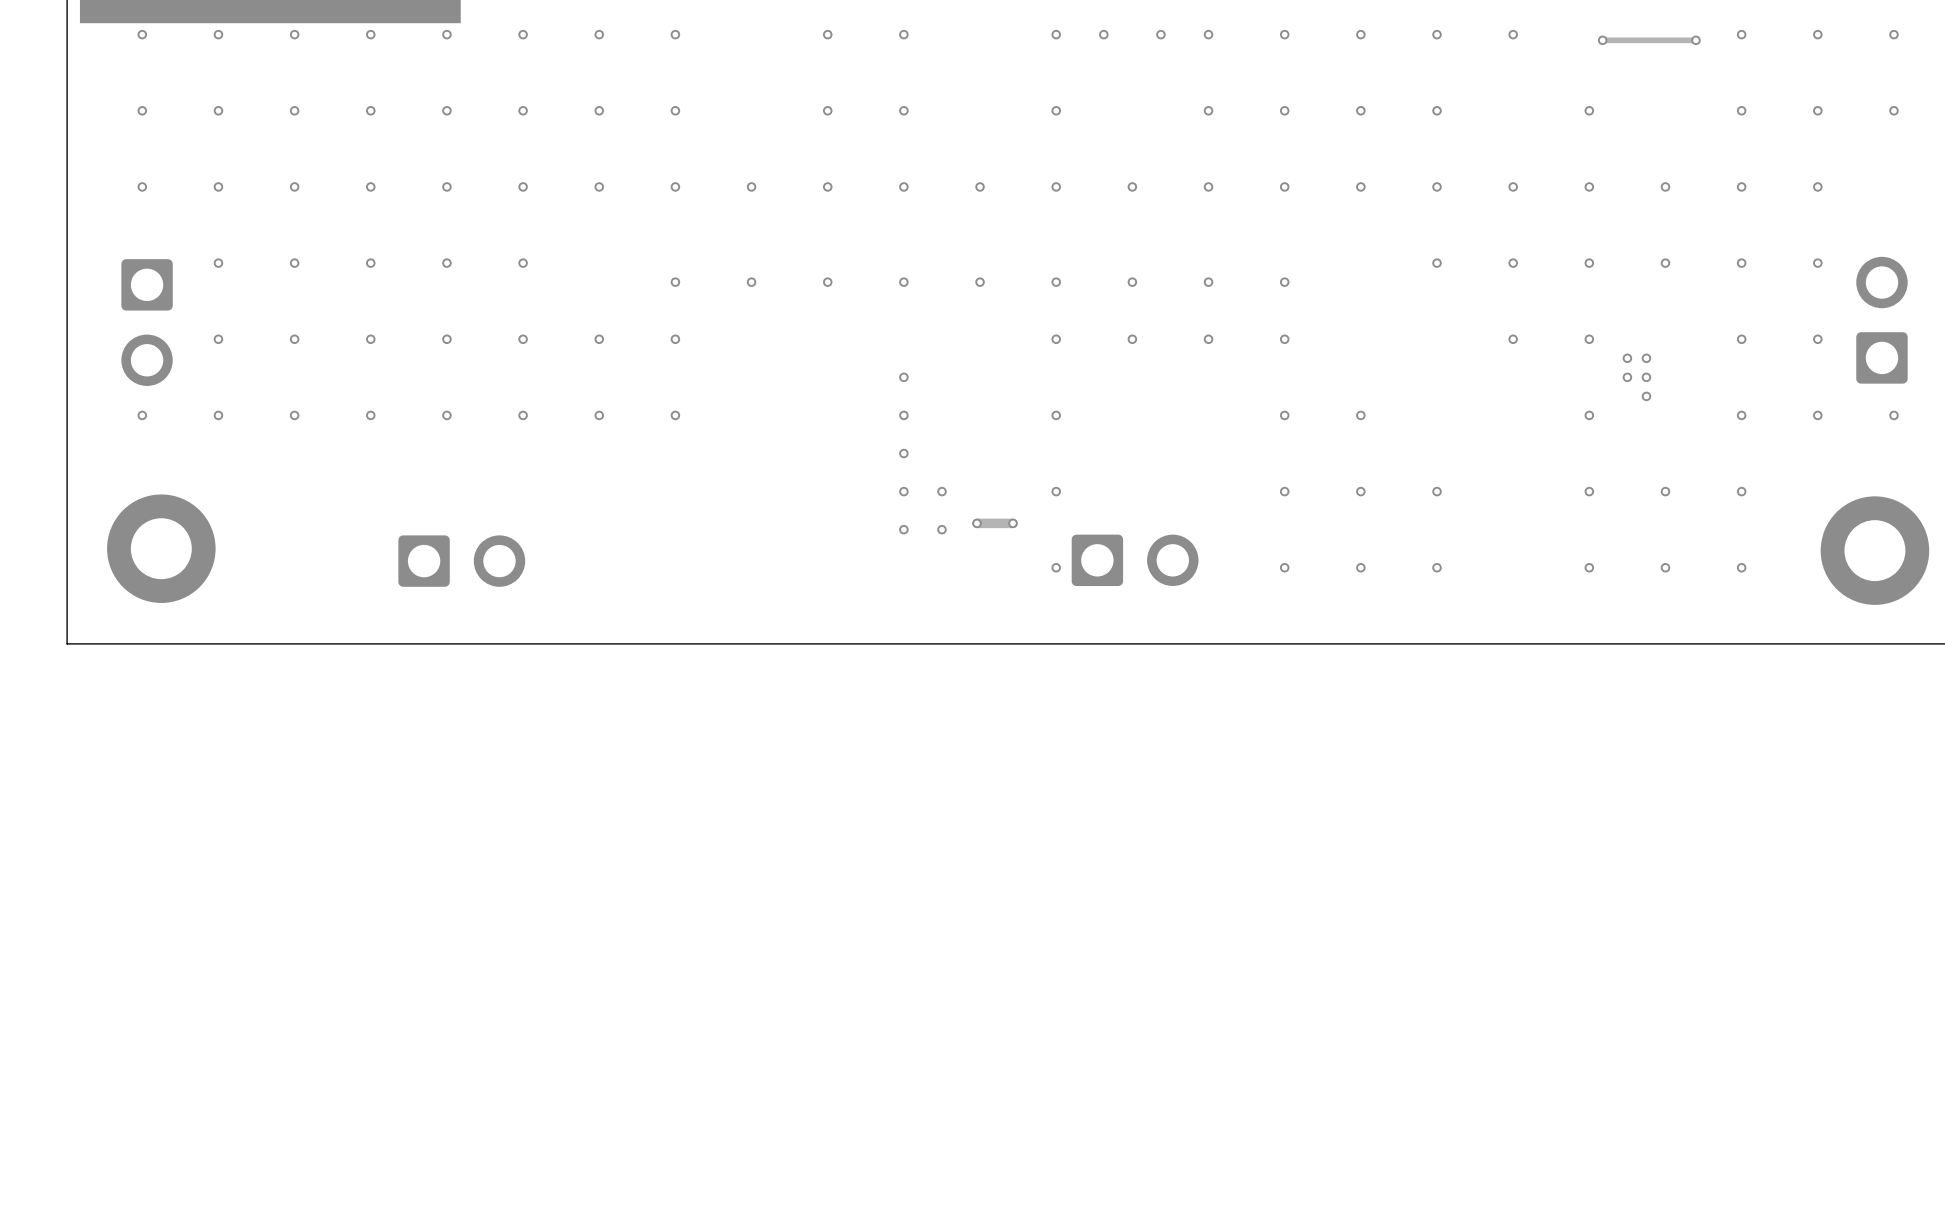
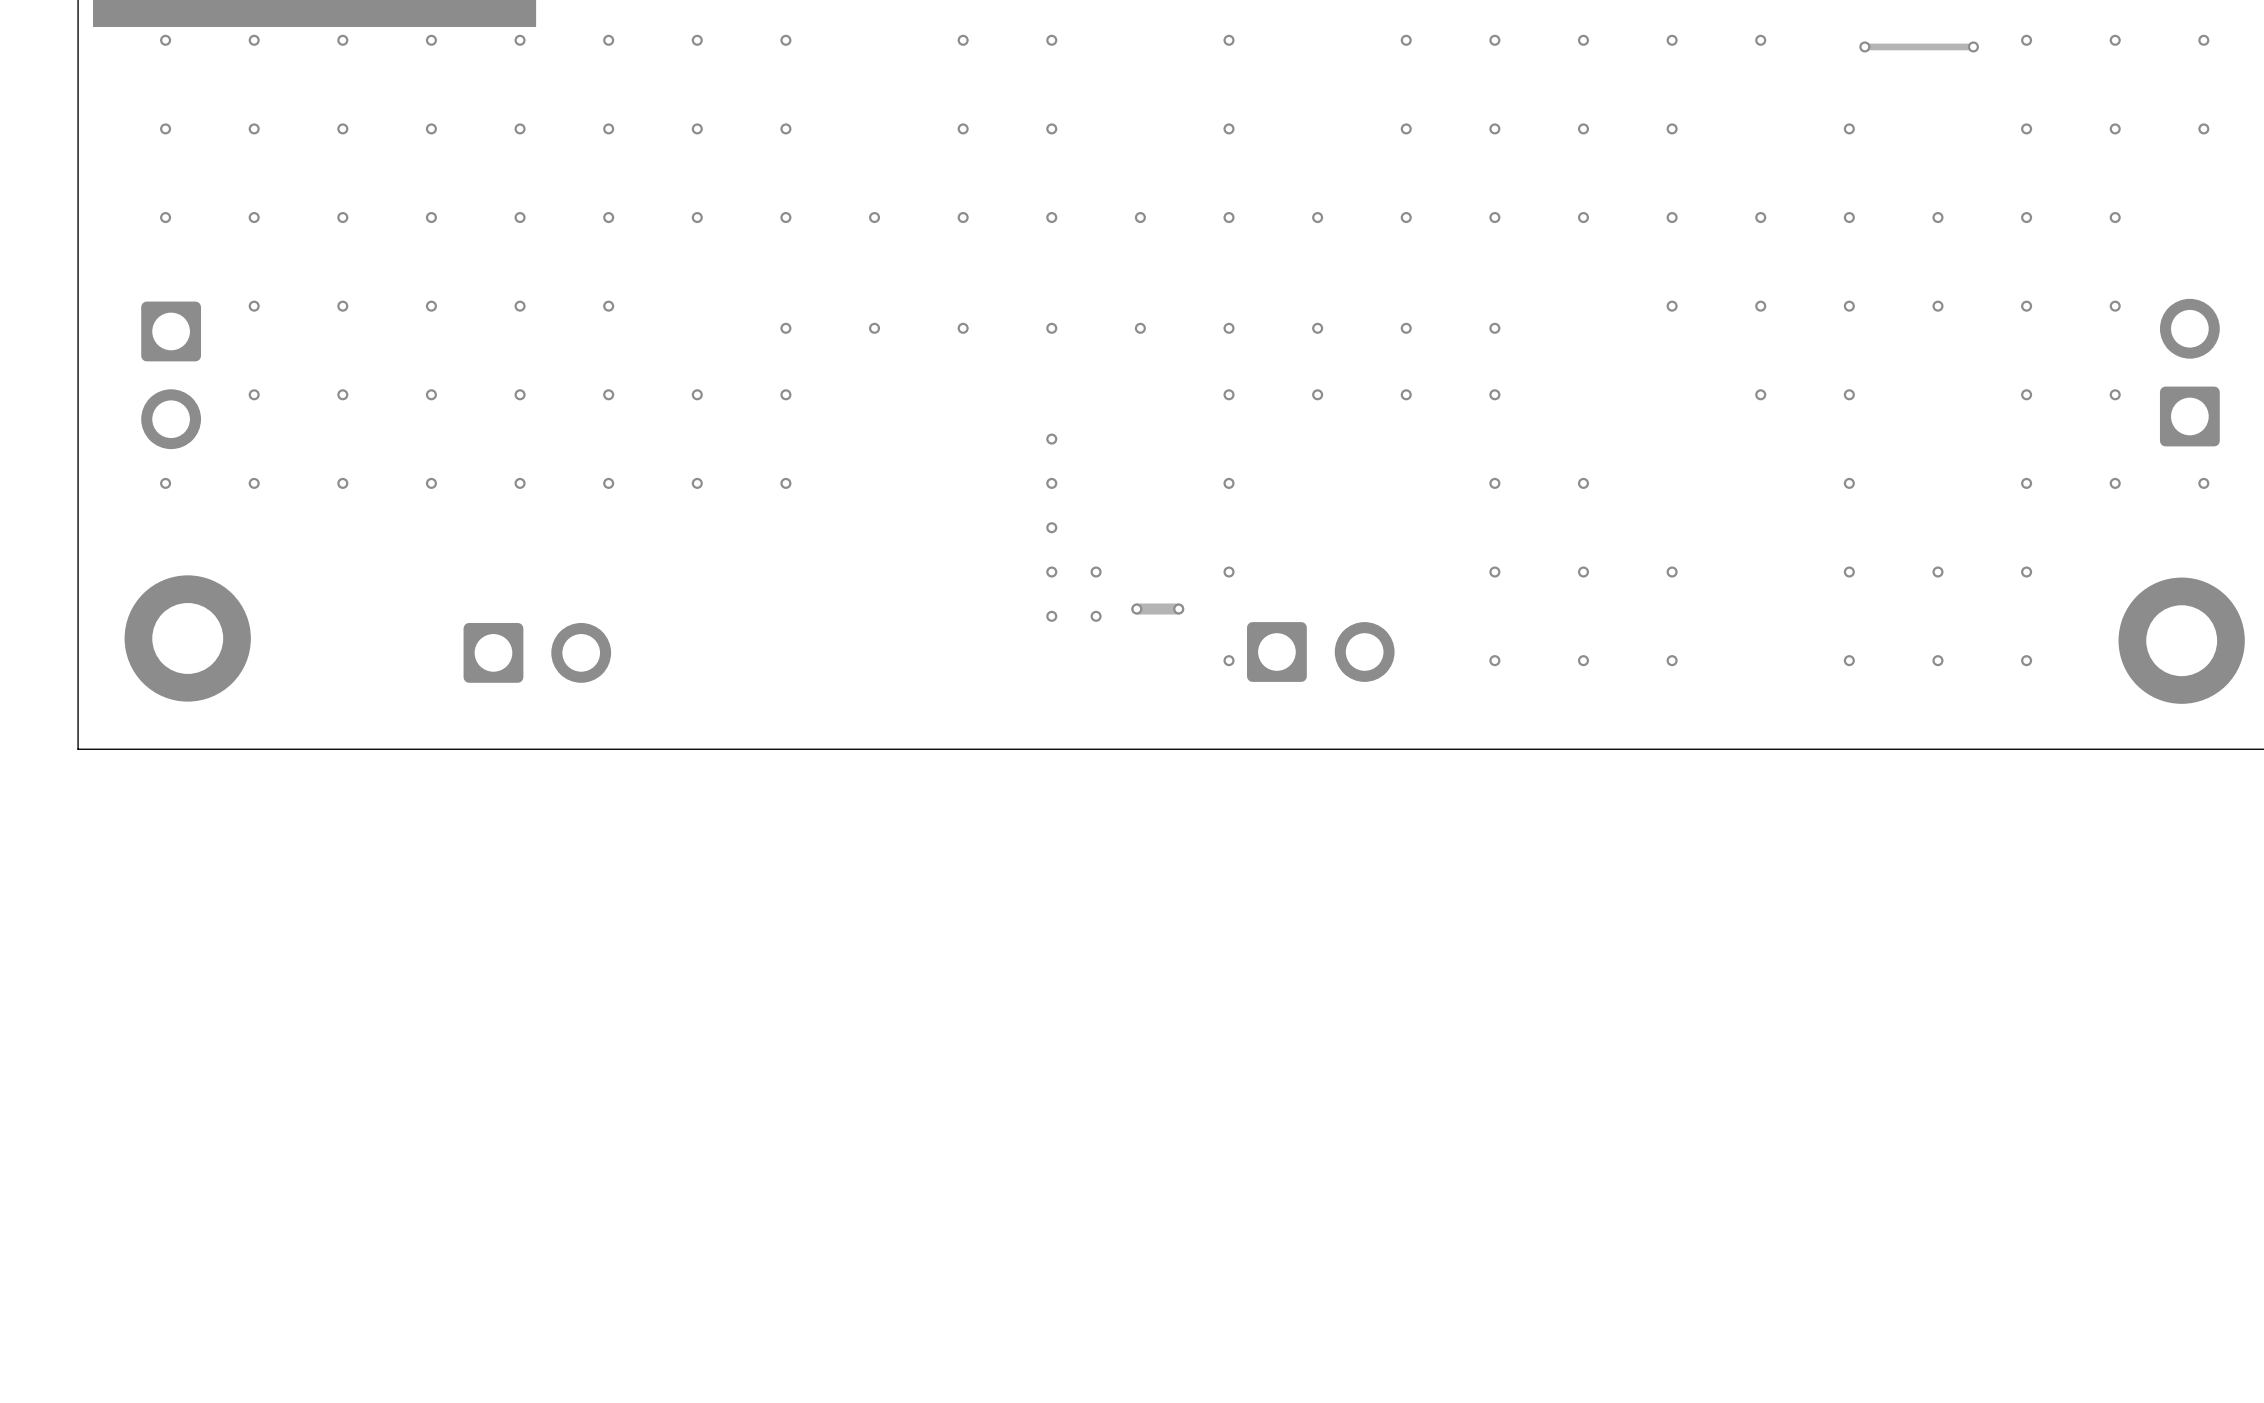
via: (1103, 34) -> none
via: (1160, 34) -> none
via: (1627, 358) -> none
via: (1646, 358) -> none
via: (1627, 377) -> none
via: (1646, 377) -> none
via: (1646, 396) -> none

